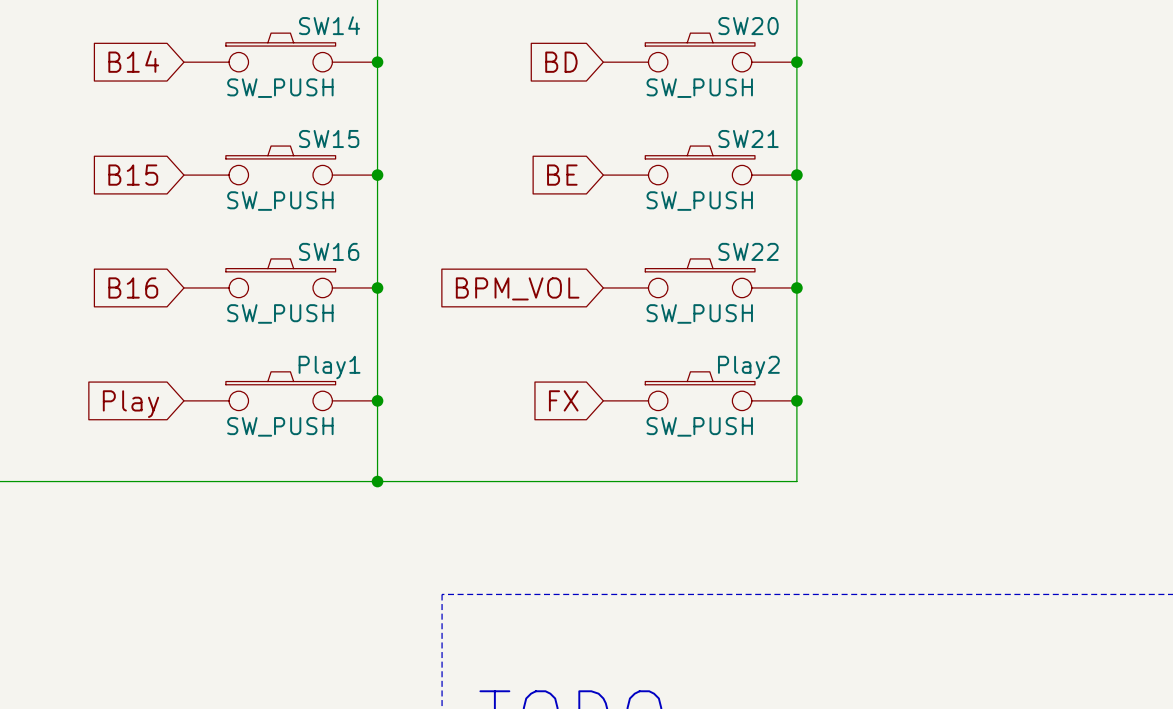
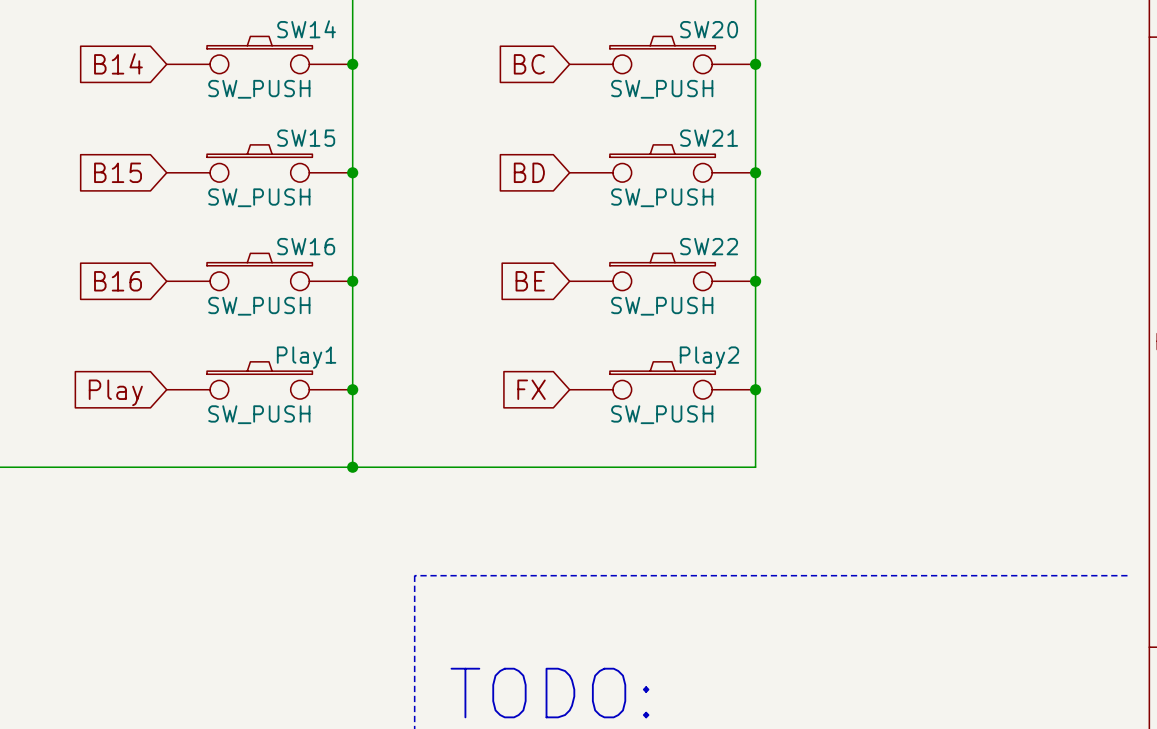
global label: BD (561, 62) -> BC (529, 64)
global label: BE (562, 175) -> BD (529, 172)
global label: BPM_VOL (517, 288) -> BE (530, 281)

